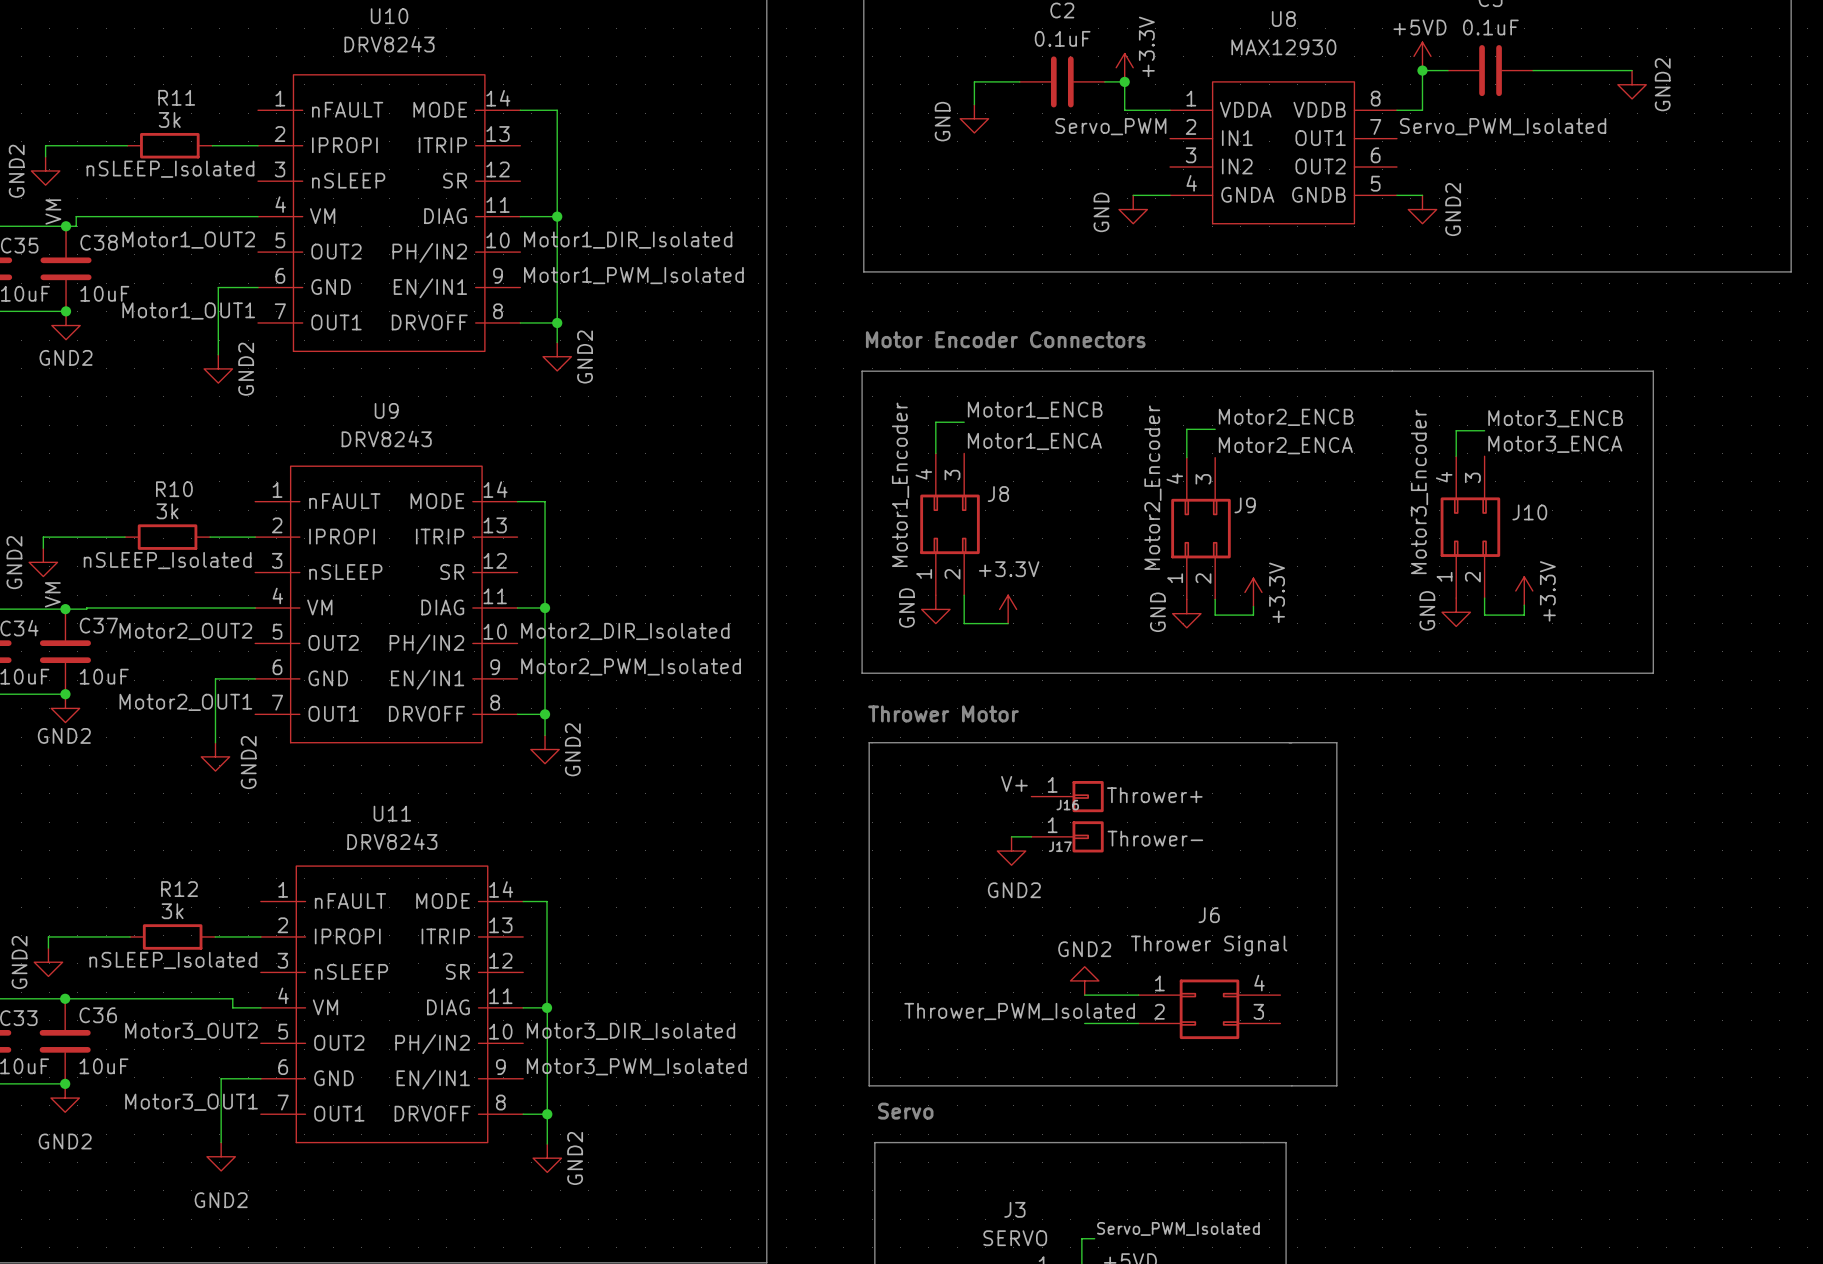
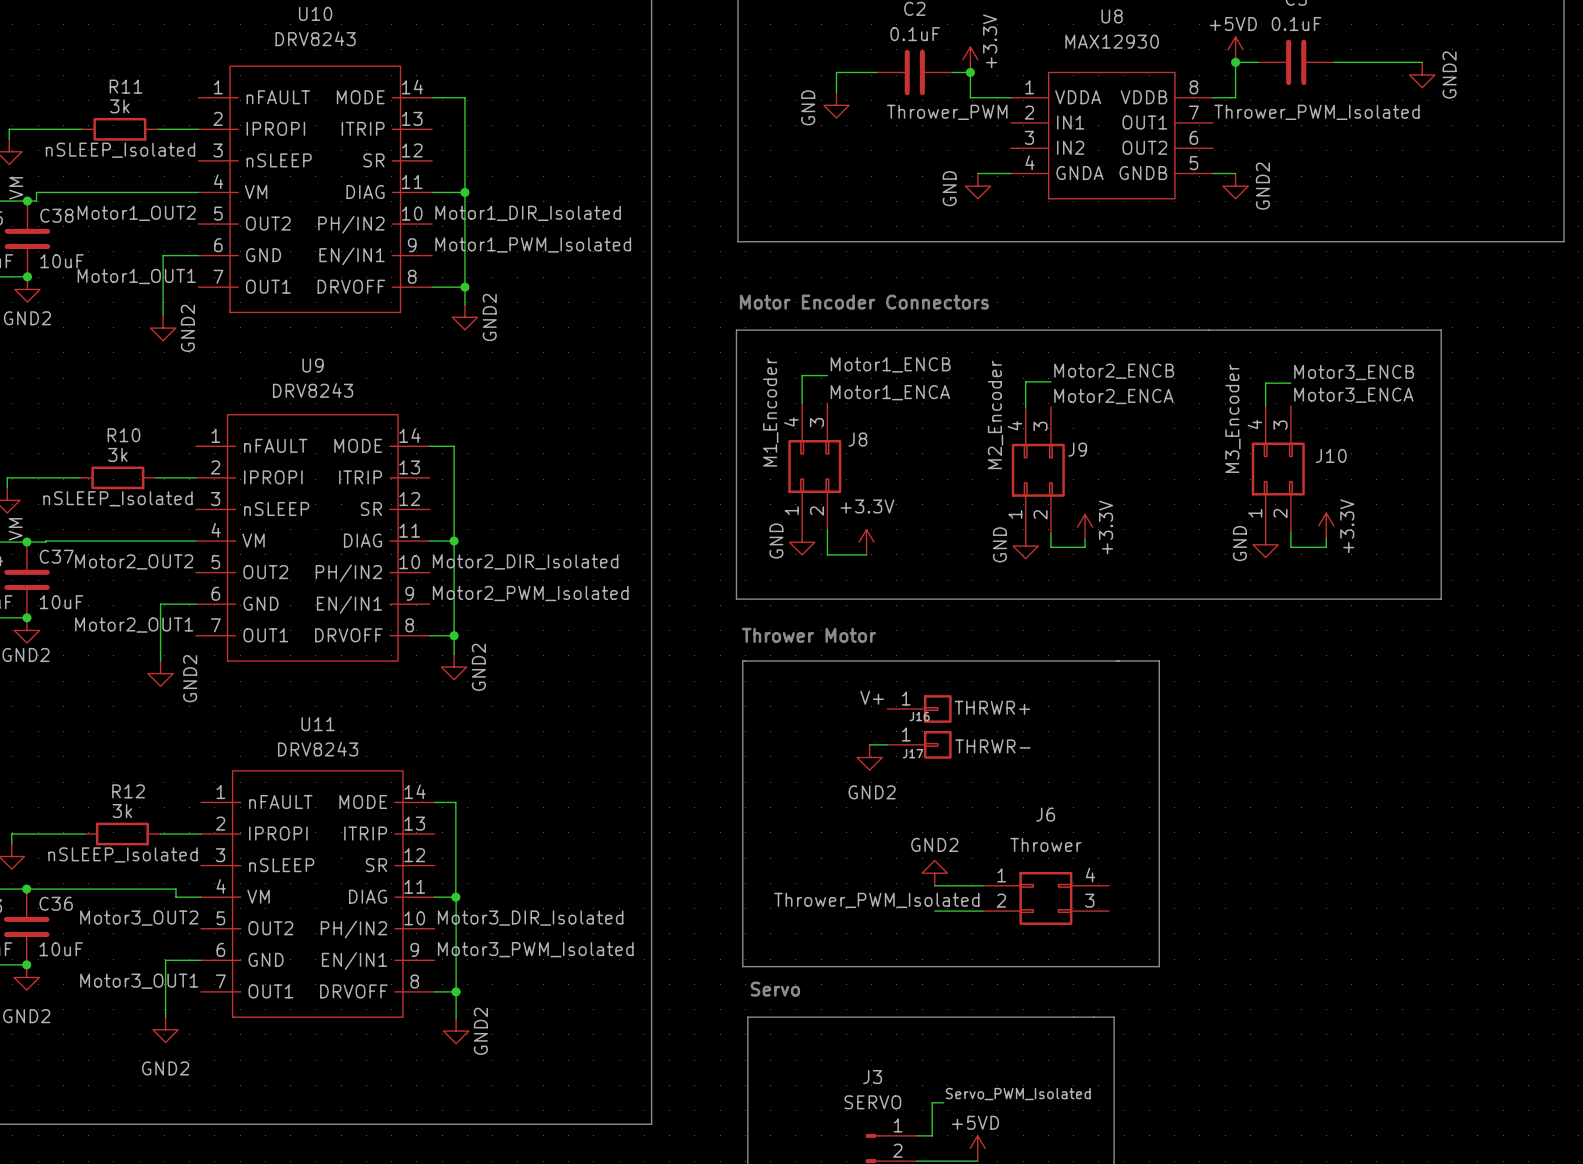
label: Servo_PWM (1110, 126) -> Thrower_PWM (947, 112)
label: Servo_PWM_Isolated (1503, 126) -> Thrower_PWM_Isolated (1317, 112)
J8 value: Motor1_Encoder (900, 484) -> M1_Encoder (770, 412)
J9 value: Motor2_Encoder (1152, 487) -> M2_Encoder (995, 414)
J10 value: Motor3_Encoder (1419, 491) -> M3_Encoder (1232, 418)
J16 value: Thrower+ (1154, 795) -> THRWR+ (992, 707)
J17 value: Thrower- (1155, 838) -> THRWR- (992, 746)
J6 value: Thrower Signal (1209, 945) -> Thrower (1045, 844)

